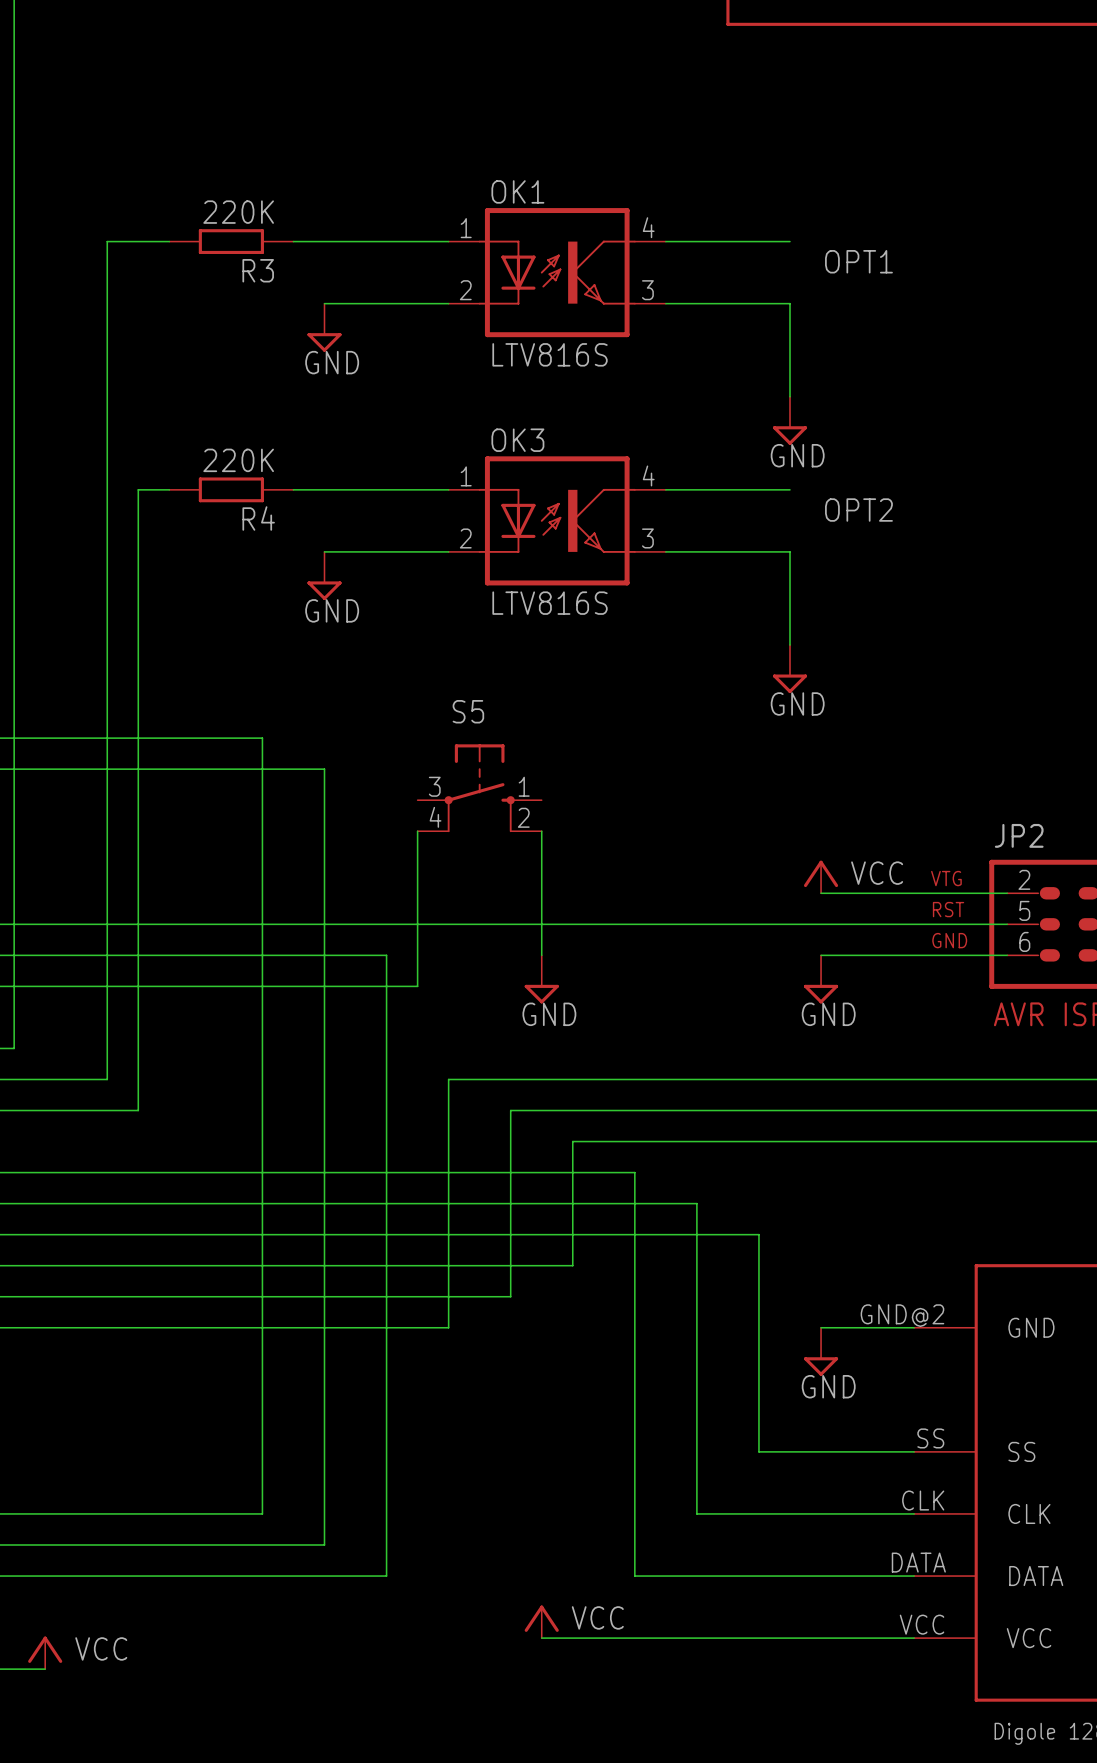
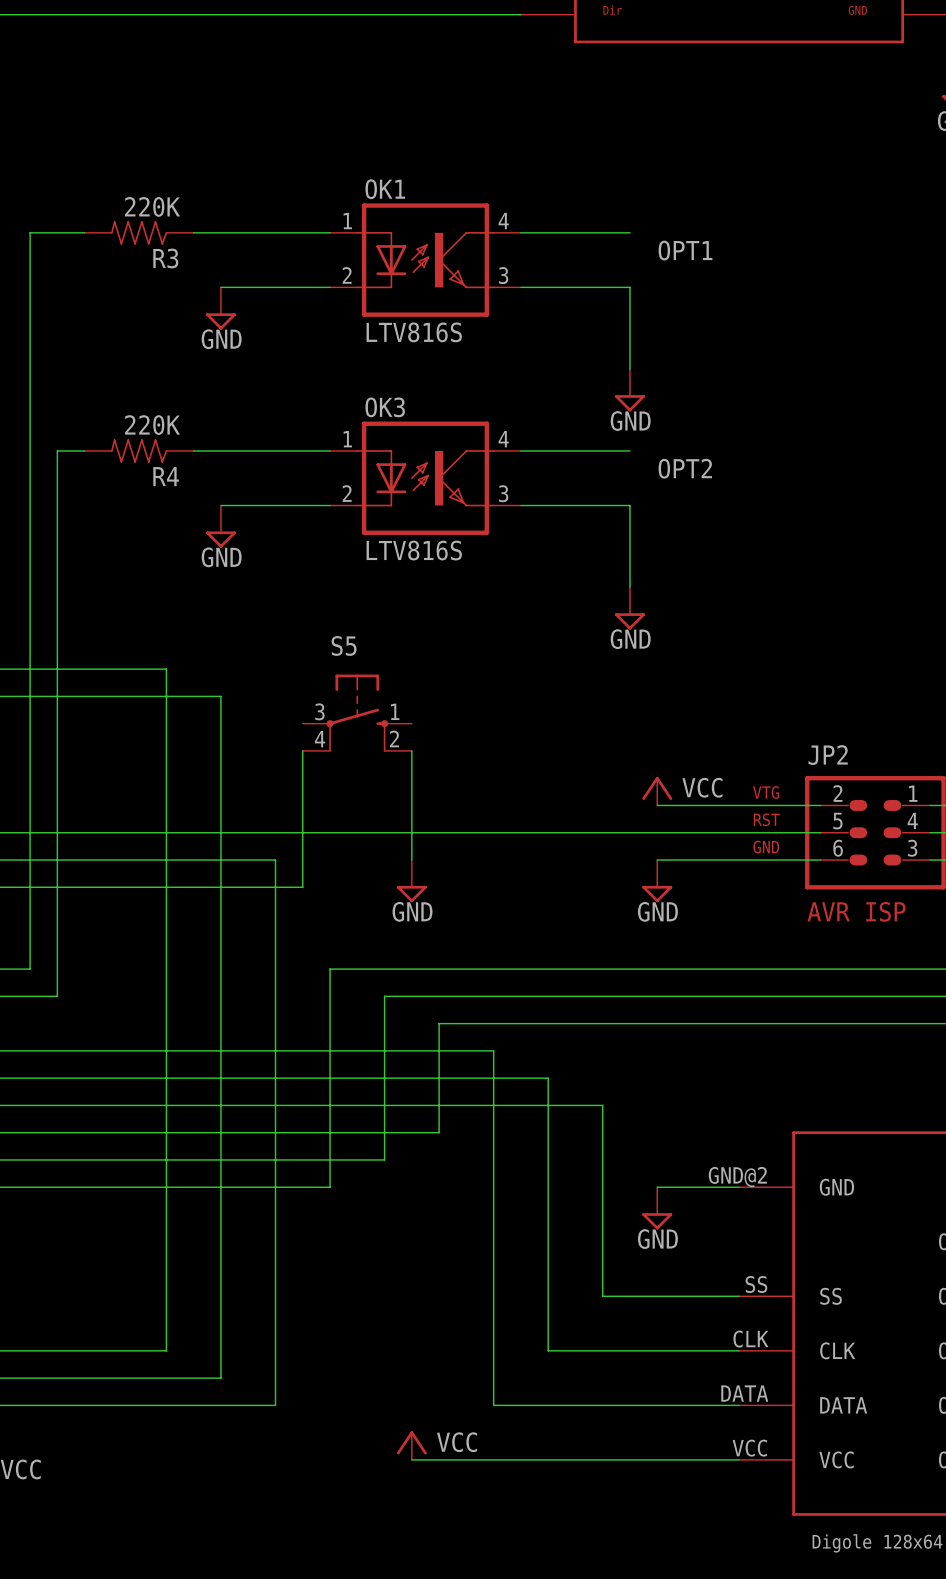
R3 symbol: [169, 229, 294, 254] -> [84, 221, 194, 245]
R4 symbol: [169, 477, 294, 503] -> [84, 439, 194, 463]

